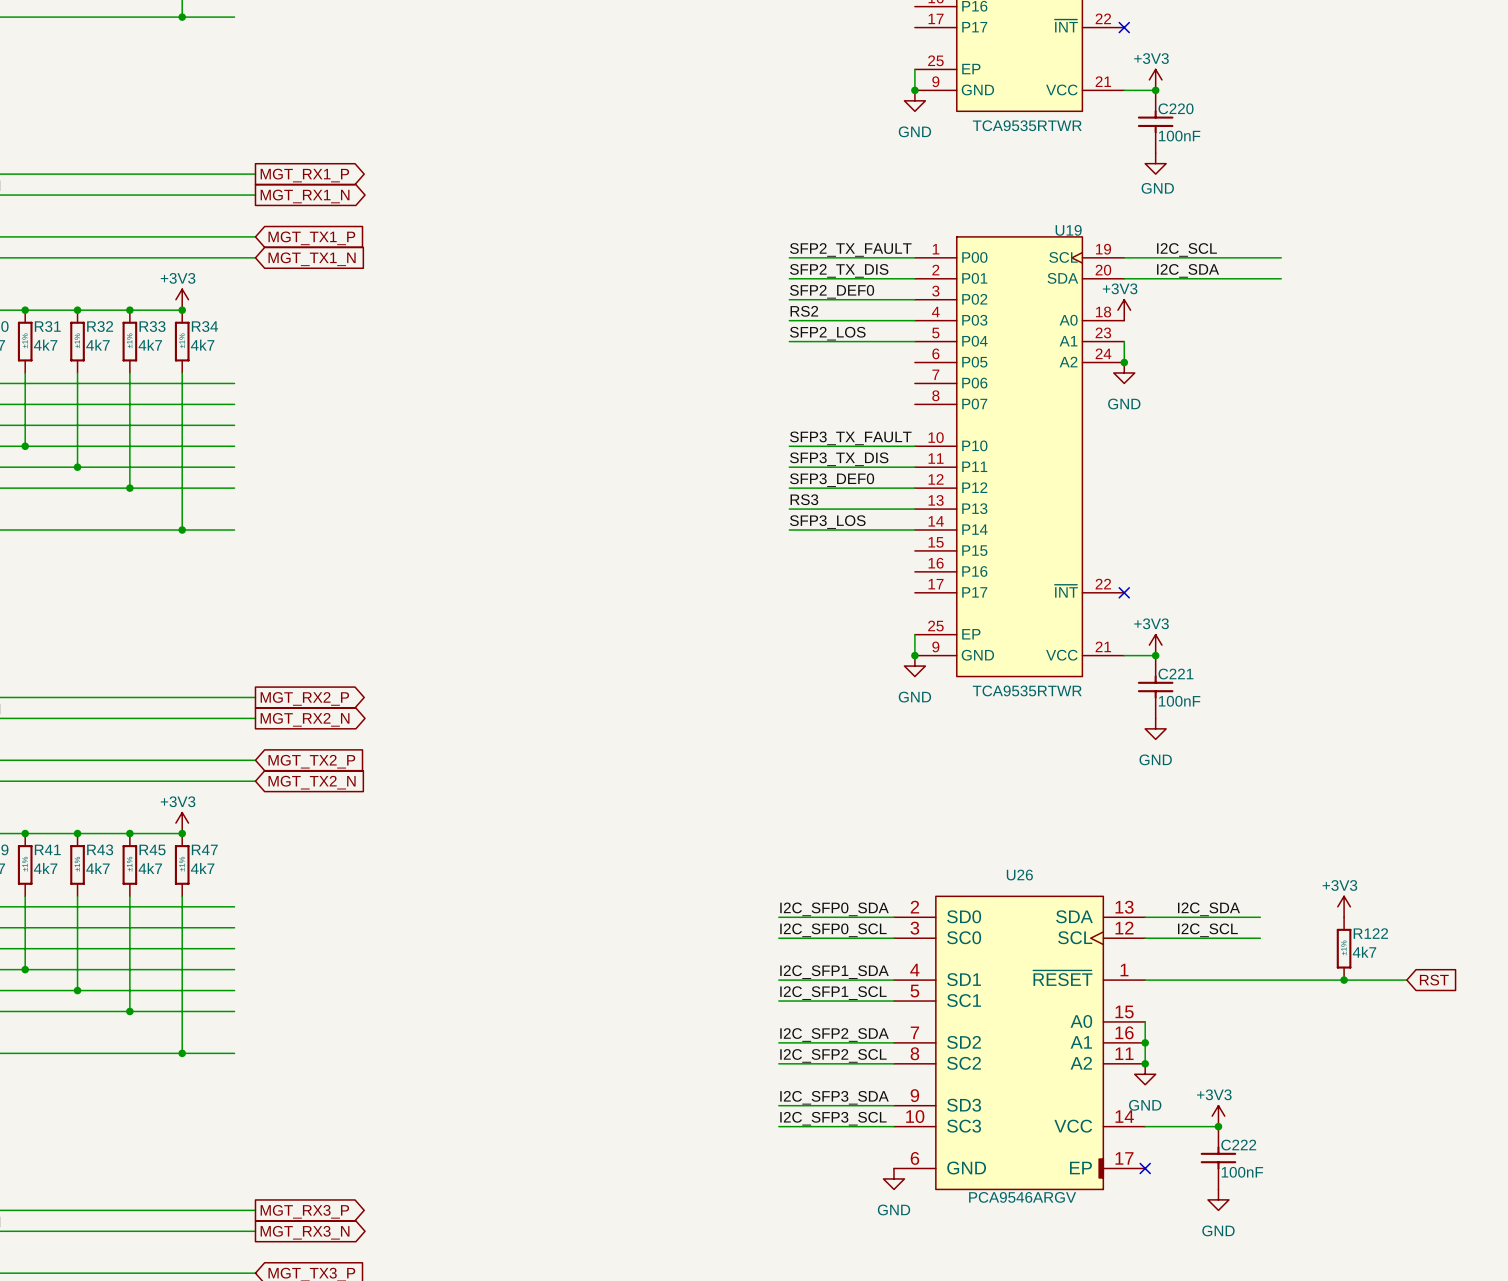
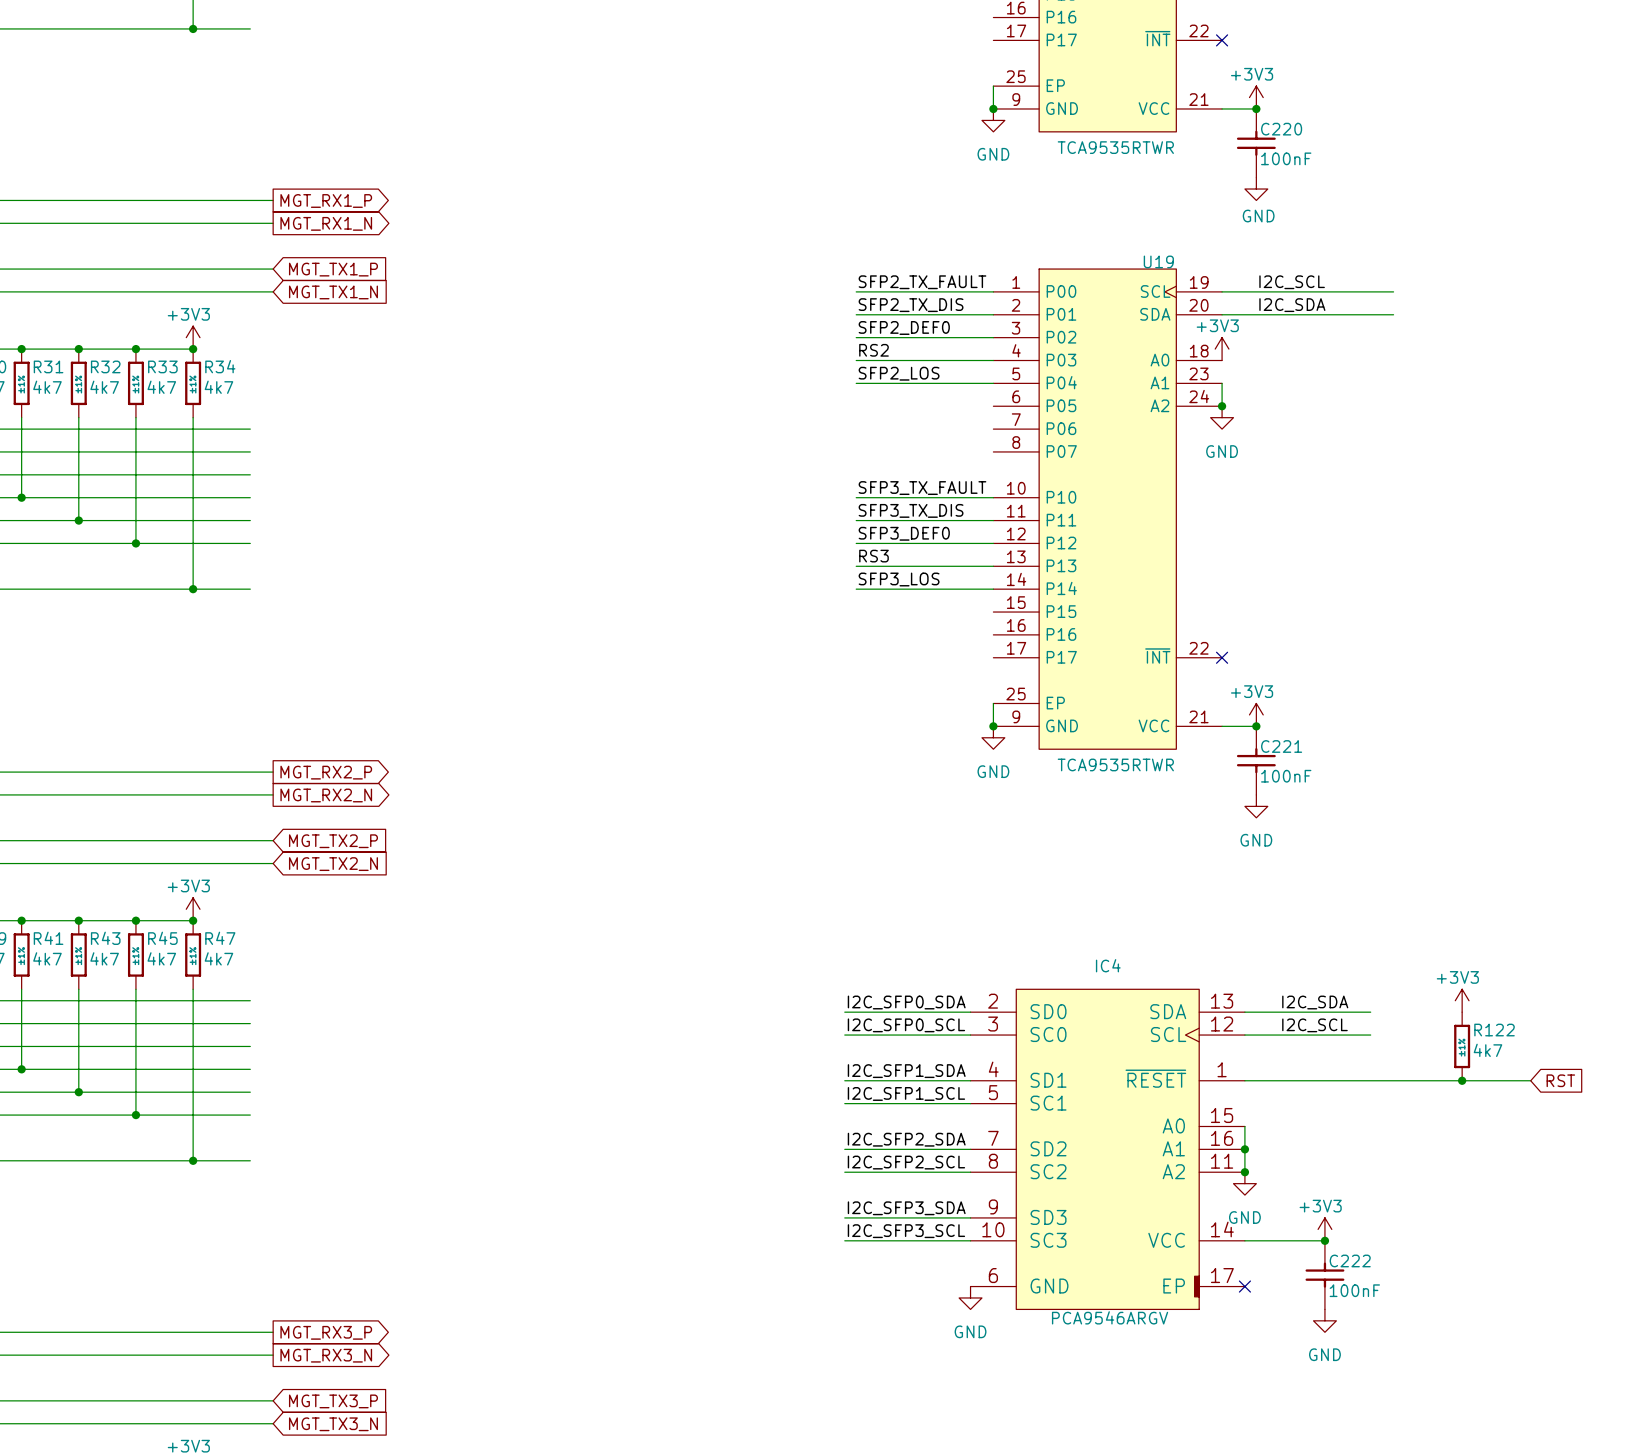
U26 name: U26 (1019, 875) -> IC4 (1108, 965)

